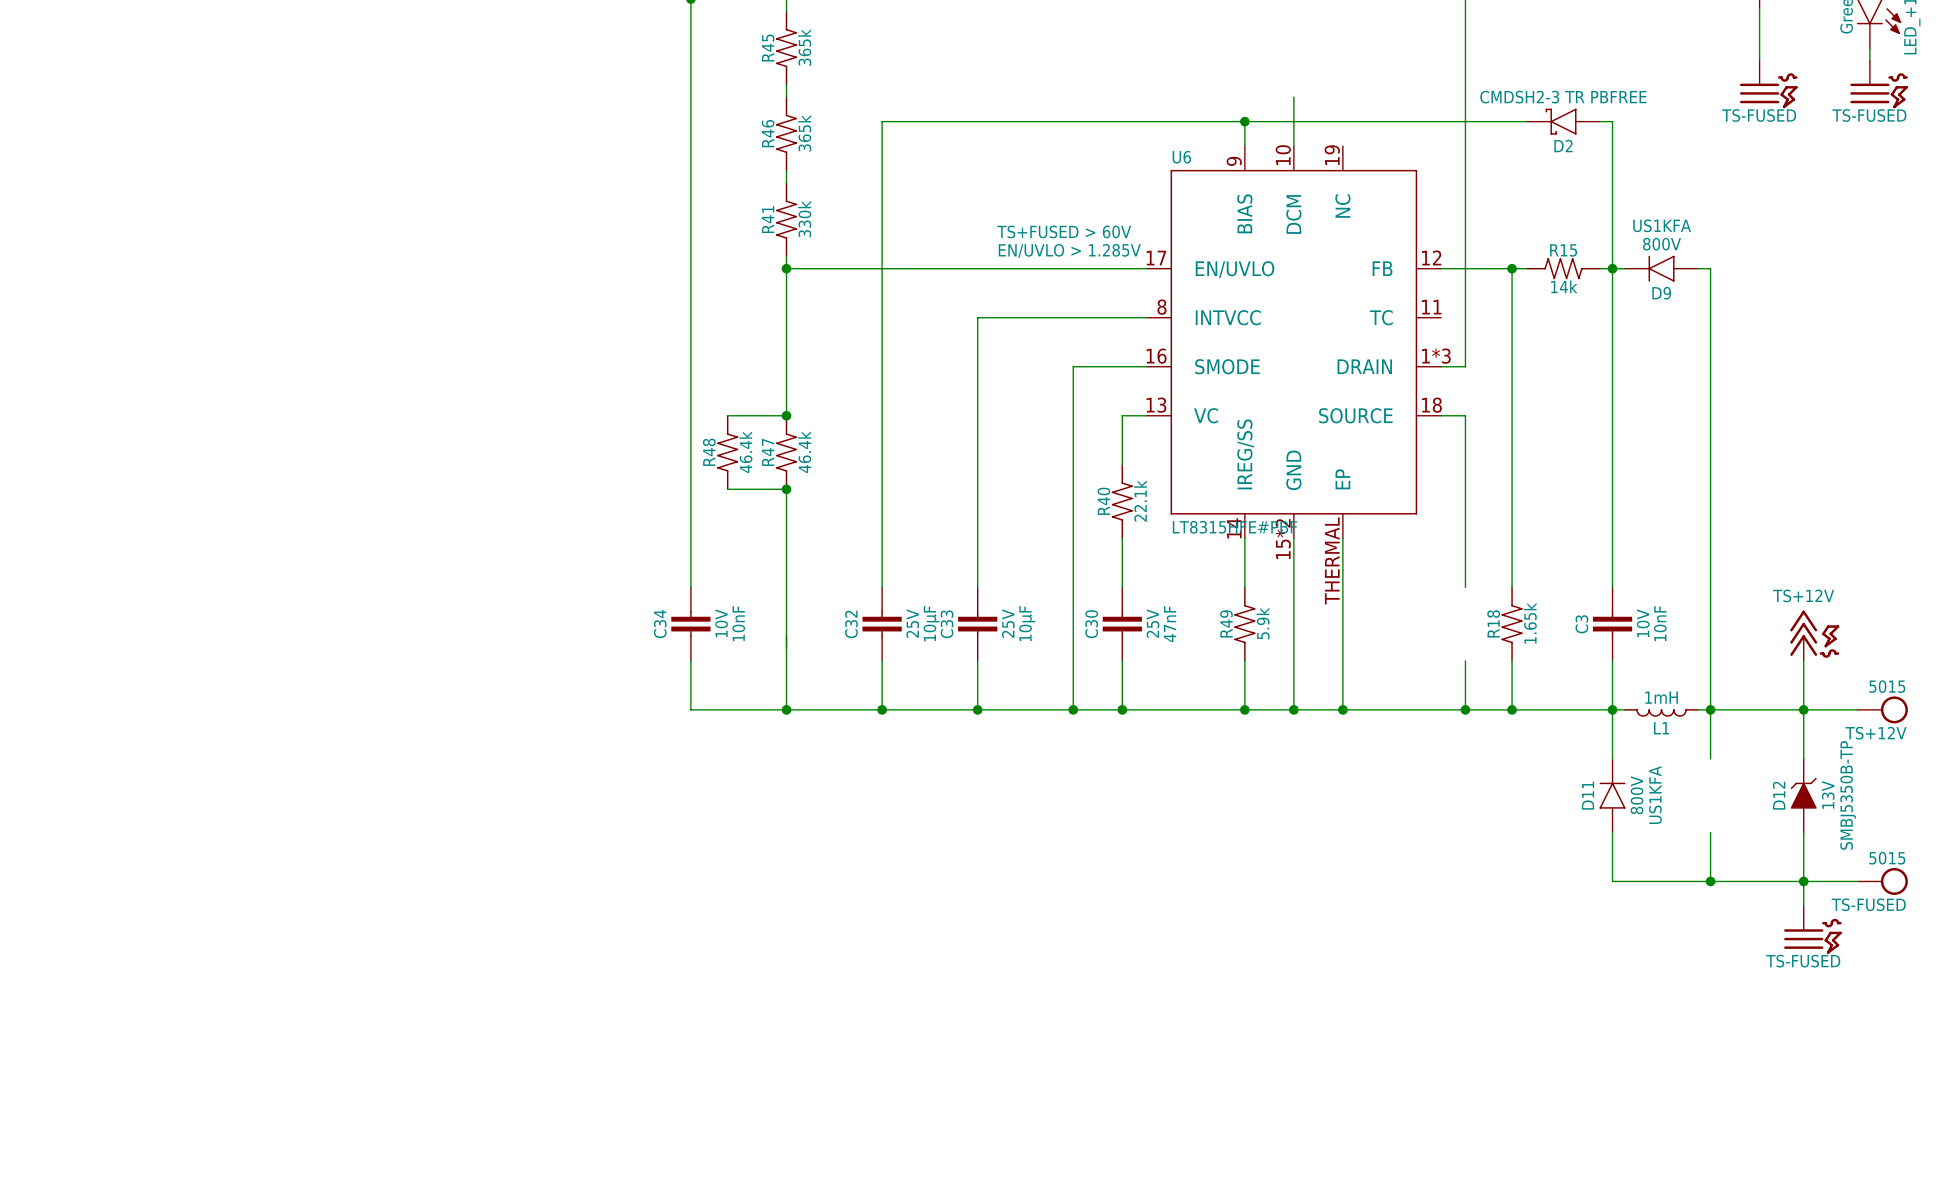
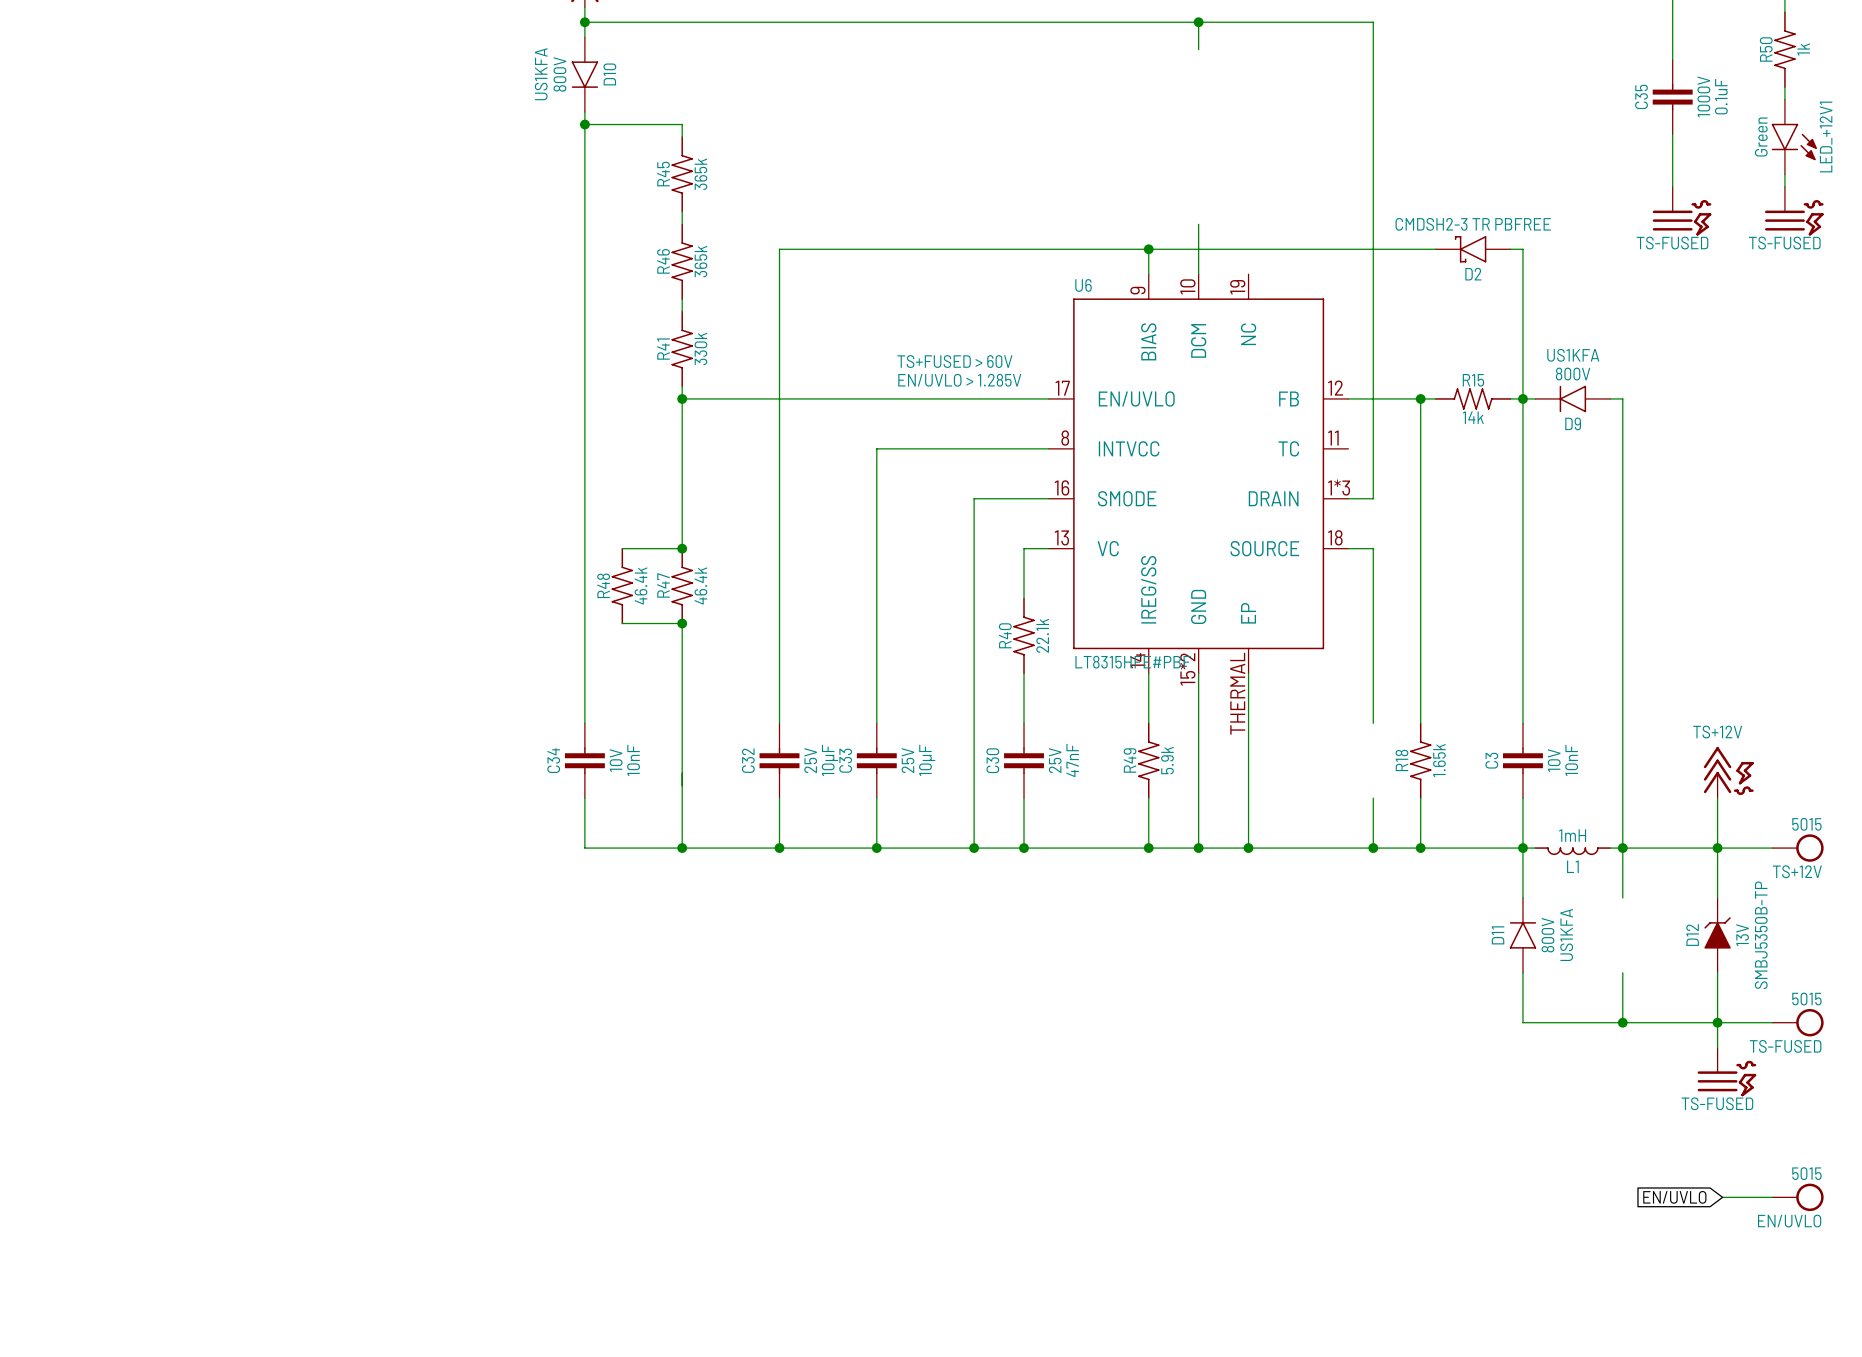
global label: none -> EN/UVLO (1674, 1197)
wire: none -> (1722, 1197) (1772, 1197)
EN/UVLO: none -> (1798, 1197)

